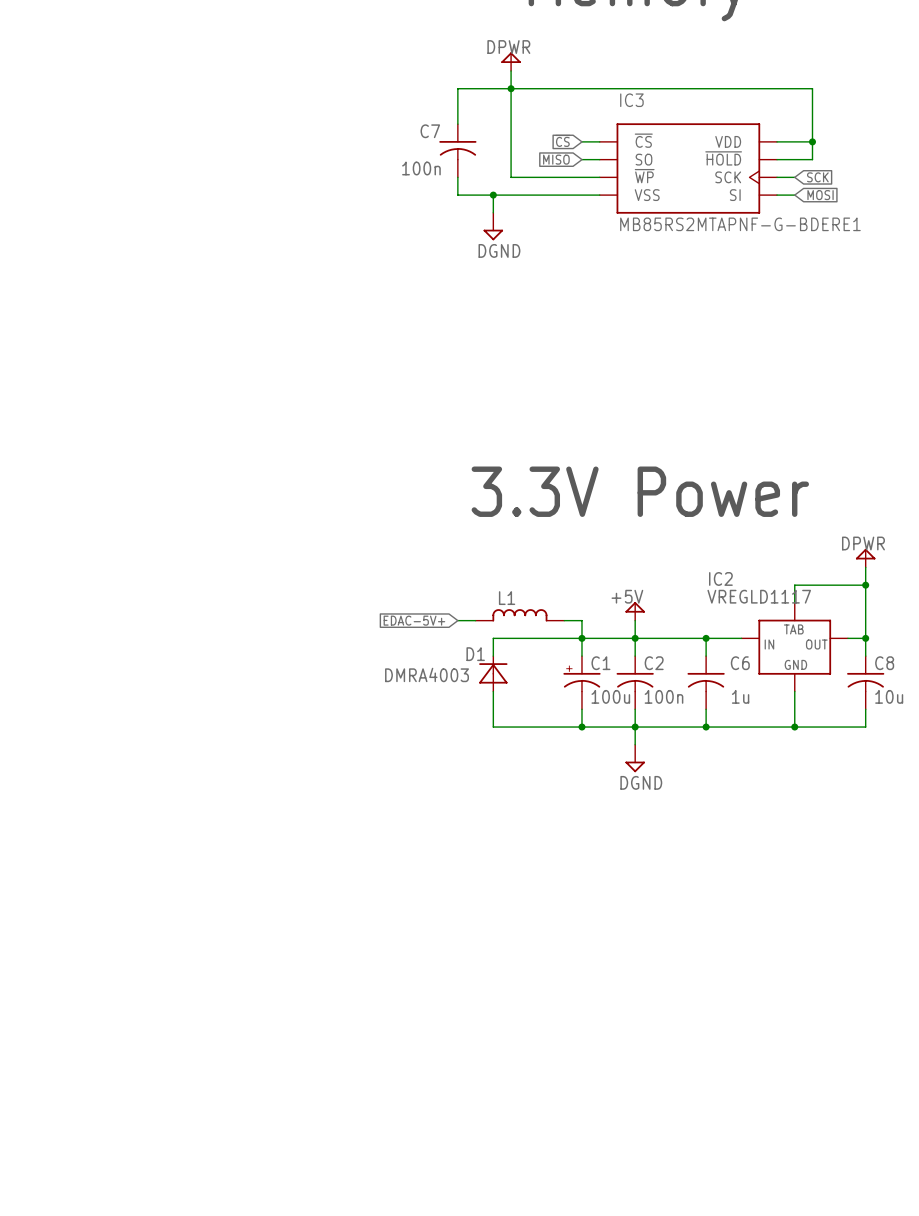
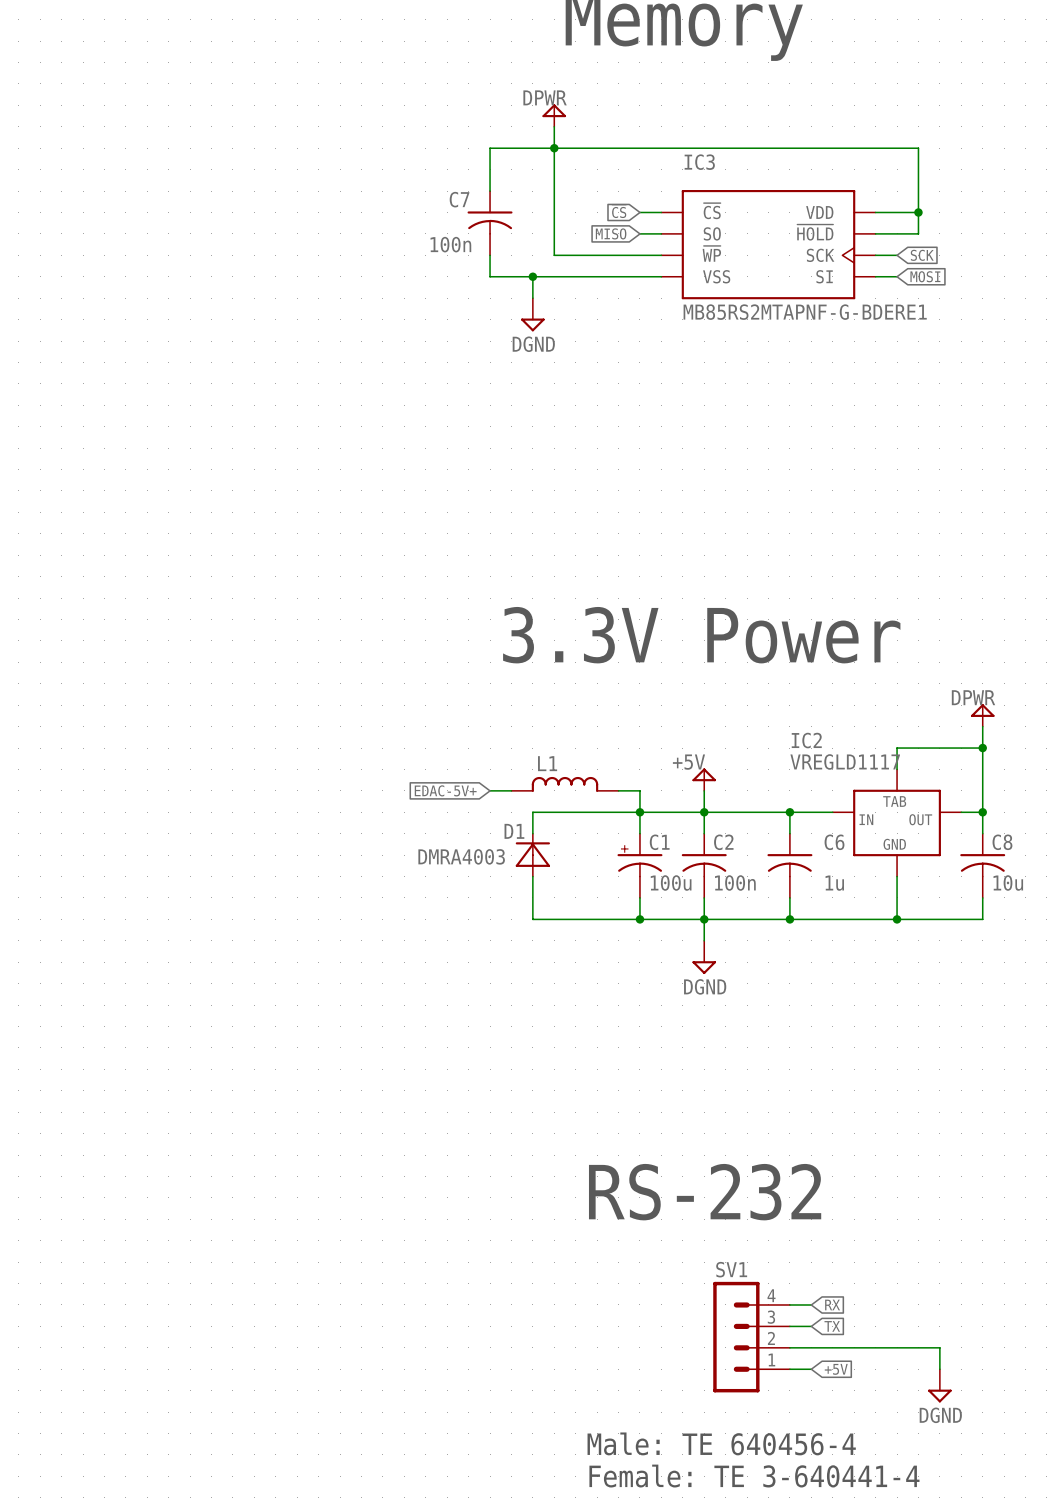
text: none -> RS-232 (705, 1192)
wire: none -> (789, 1304) (811, 1304)
global label: none -> RX (832, 1304)
wire: none -> (789, 1326) (811, 1326)
global label: none -> TX (832, 1326)
SV1: none -> (751, 1337)
wire: none -> (789, 1347) (939, 1347) (939, 1369)
wire: none -> (789, 1369) (811, 1369)
global label: none -> +5V (836, 1369)
power symbol: none -> DGND (939, 1385)
text: none -> Male: TE 640456-4 (721, 1443)
text: none -> Female: TE 3-640441-4 (754, 1476)

